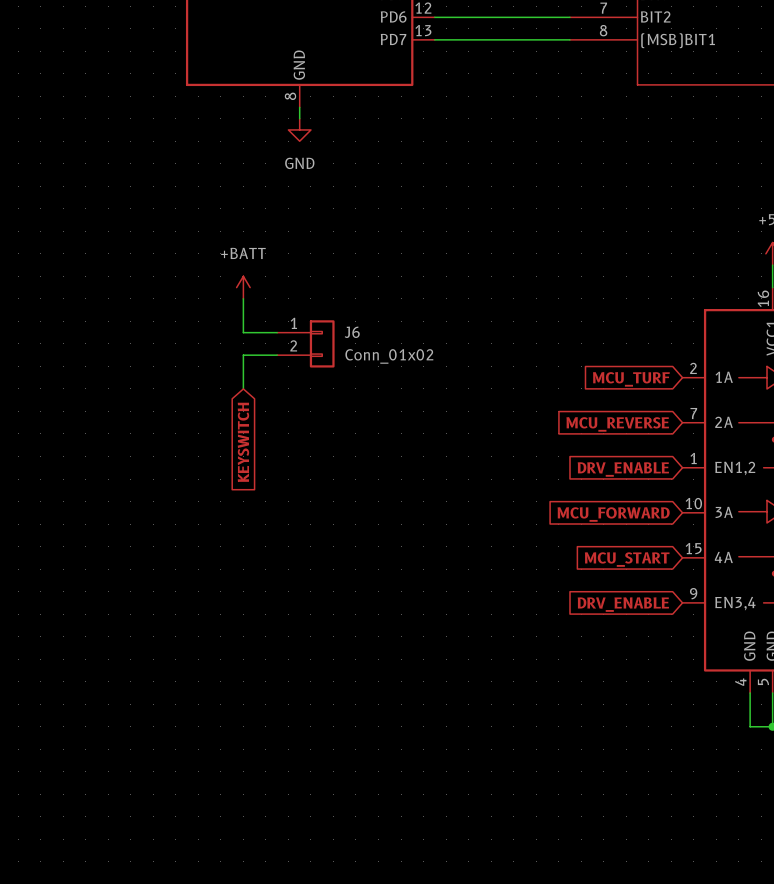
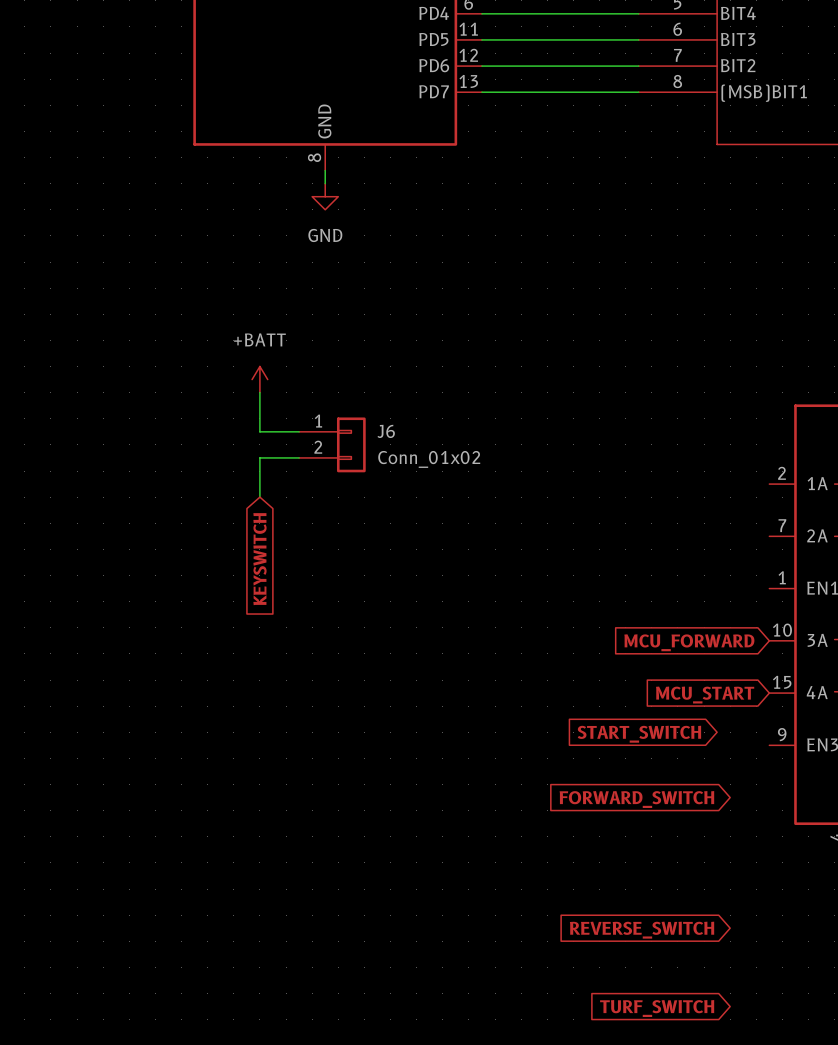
global label: MCU_TURF (631, 379) -> none
global label: MCU_REVERSE (617, 424) -> none
global label: DRV_ENABLE (623, 469) -> none
global label: none -> START_SWITCH (639, 734)
global label: DRV_ENABLE (623, 604) -> none
global label: none -> FORWARD_SWITCH (636, 799)
global label: none -> REVERSE_SWITCH (642, 930)
global label: none -> TURF_SWITCH (657, 1008)

